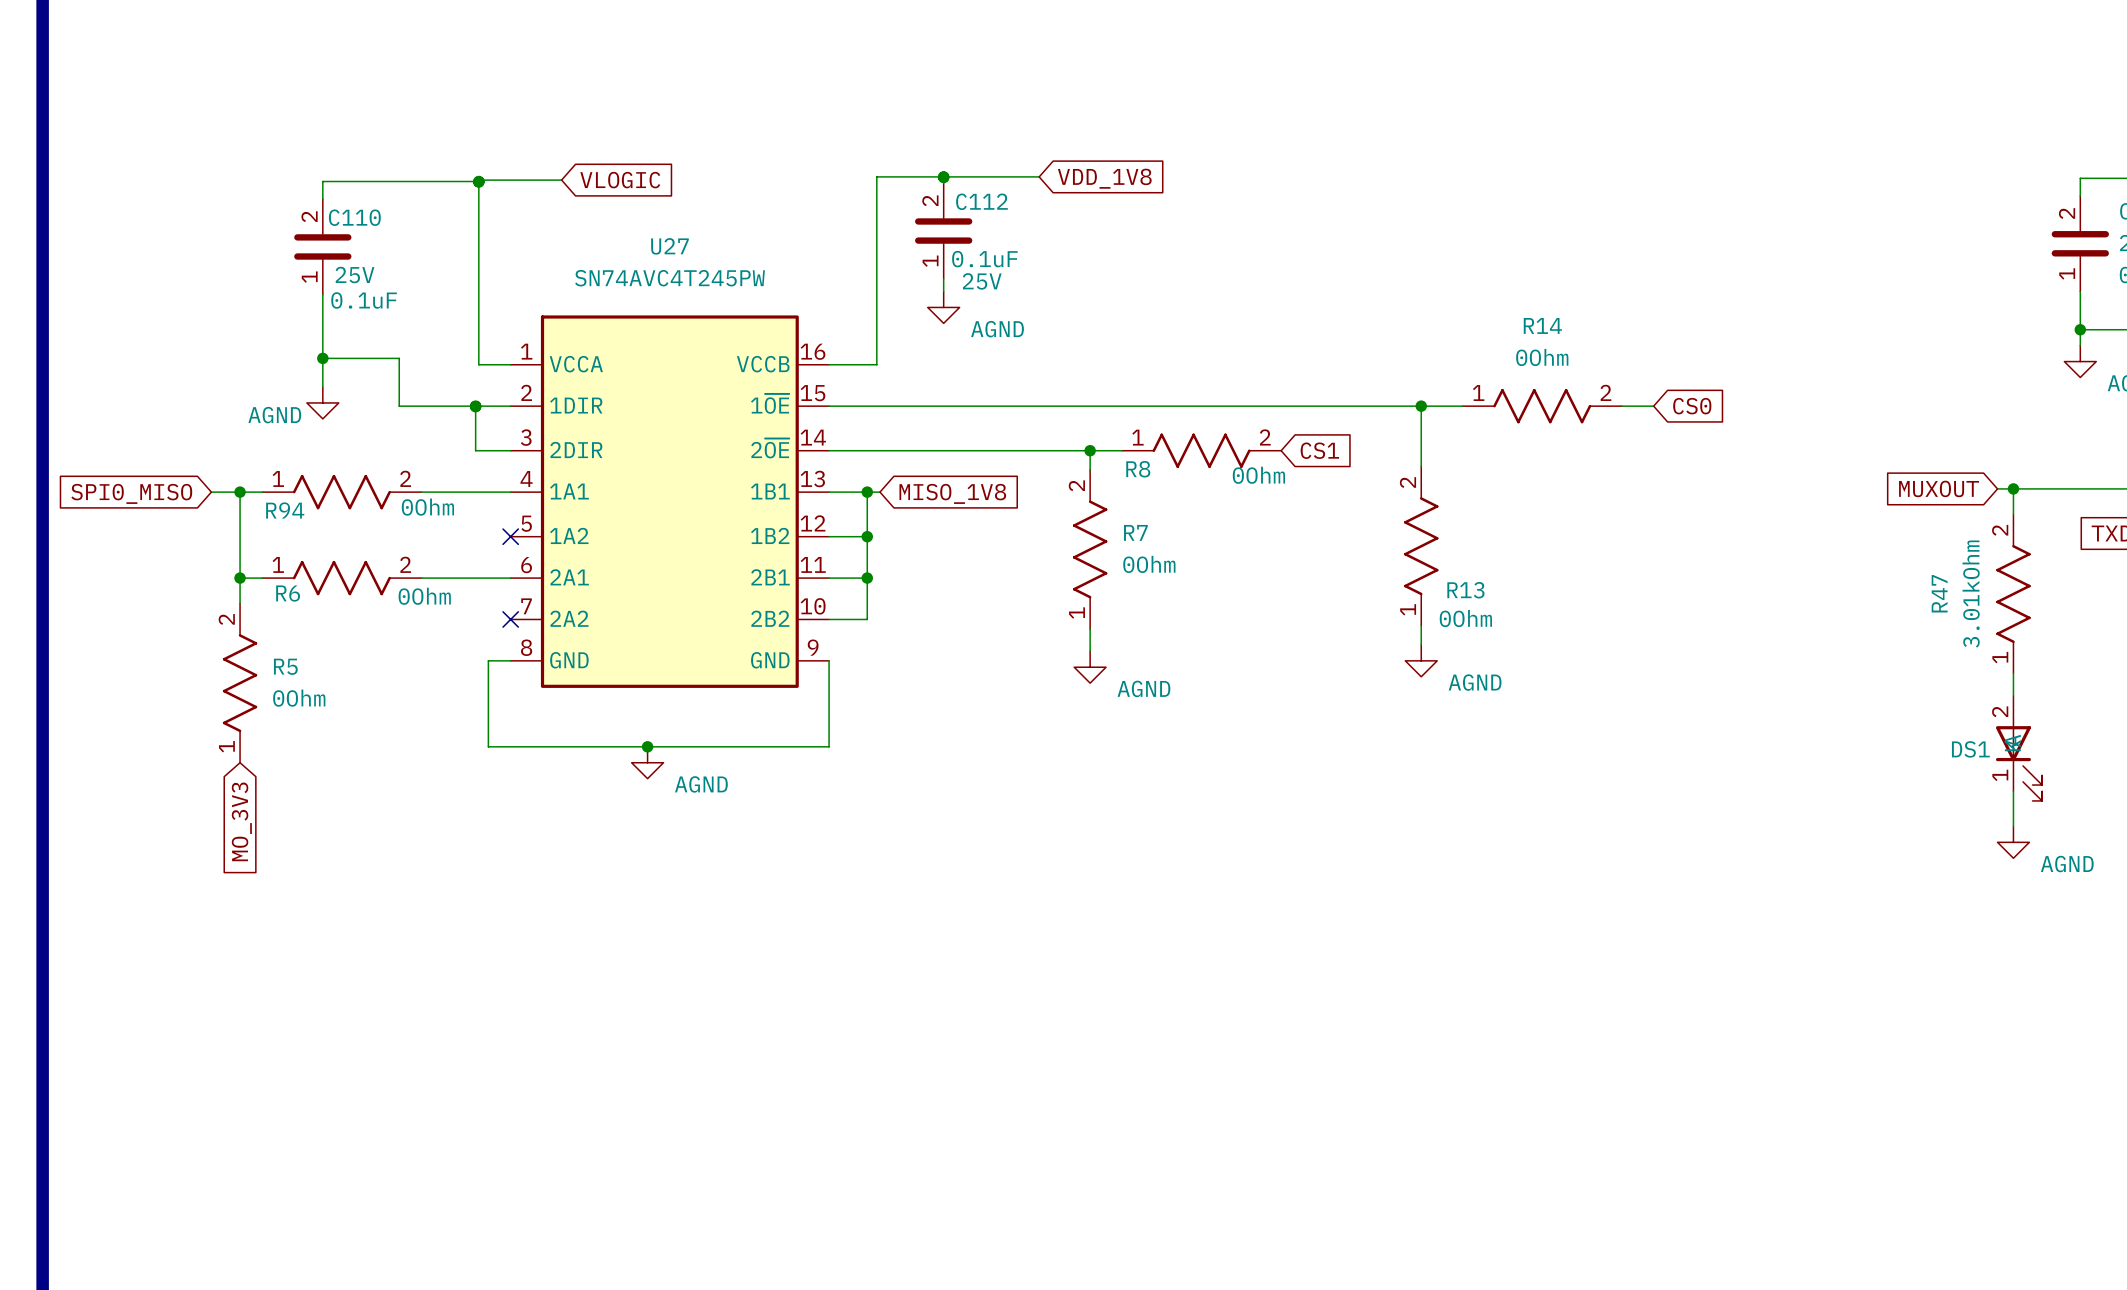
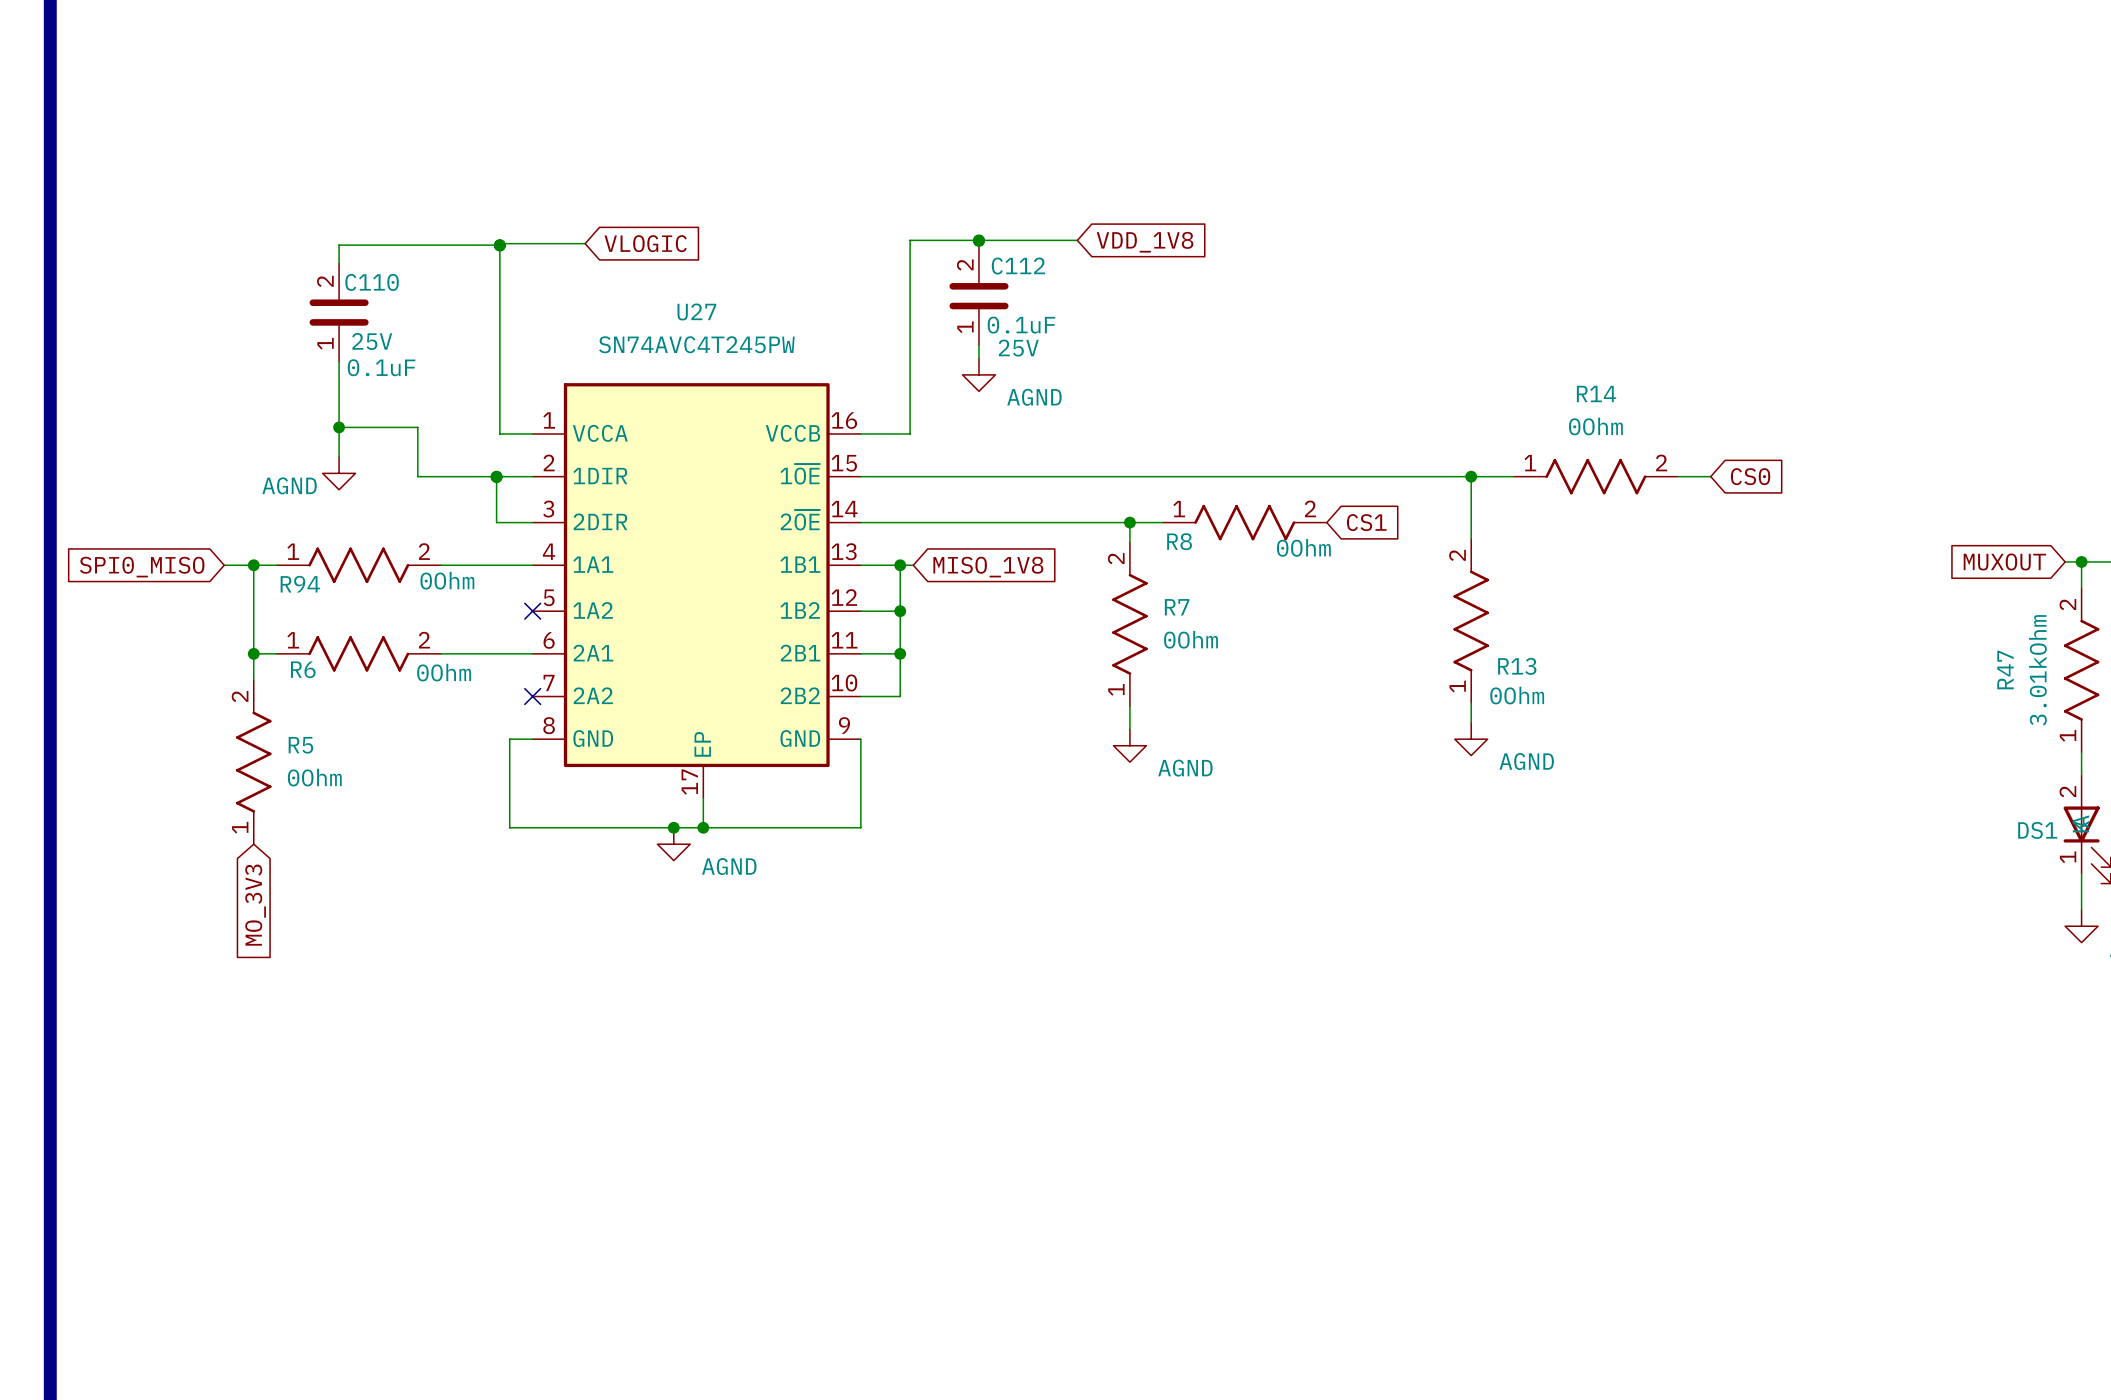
U27 symbol: [510, 315, 830, 688] -> [532, 383, 861, 799]
wire: none -> (703, 798) (703, 827)
junction: none -> (703, 827)

